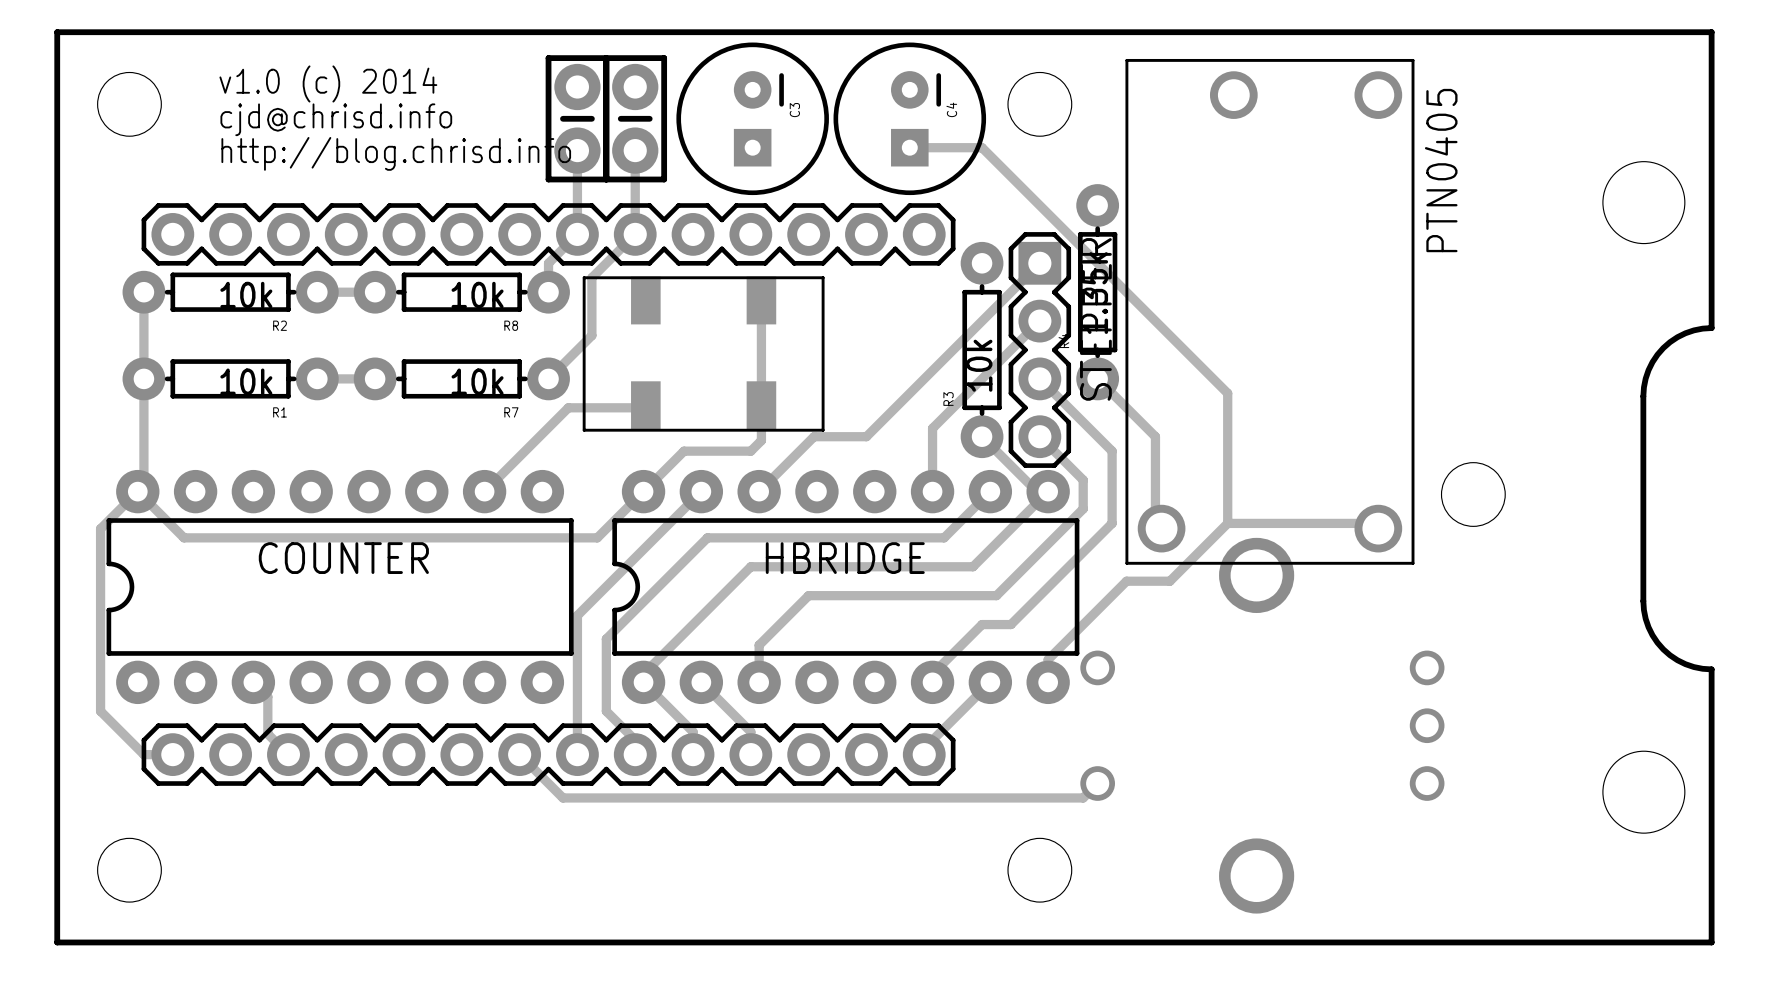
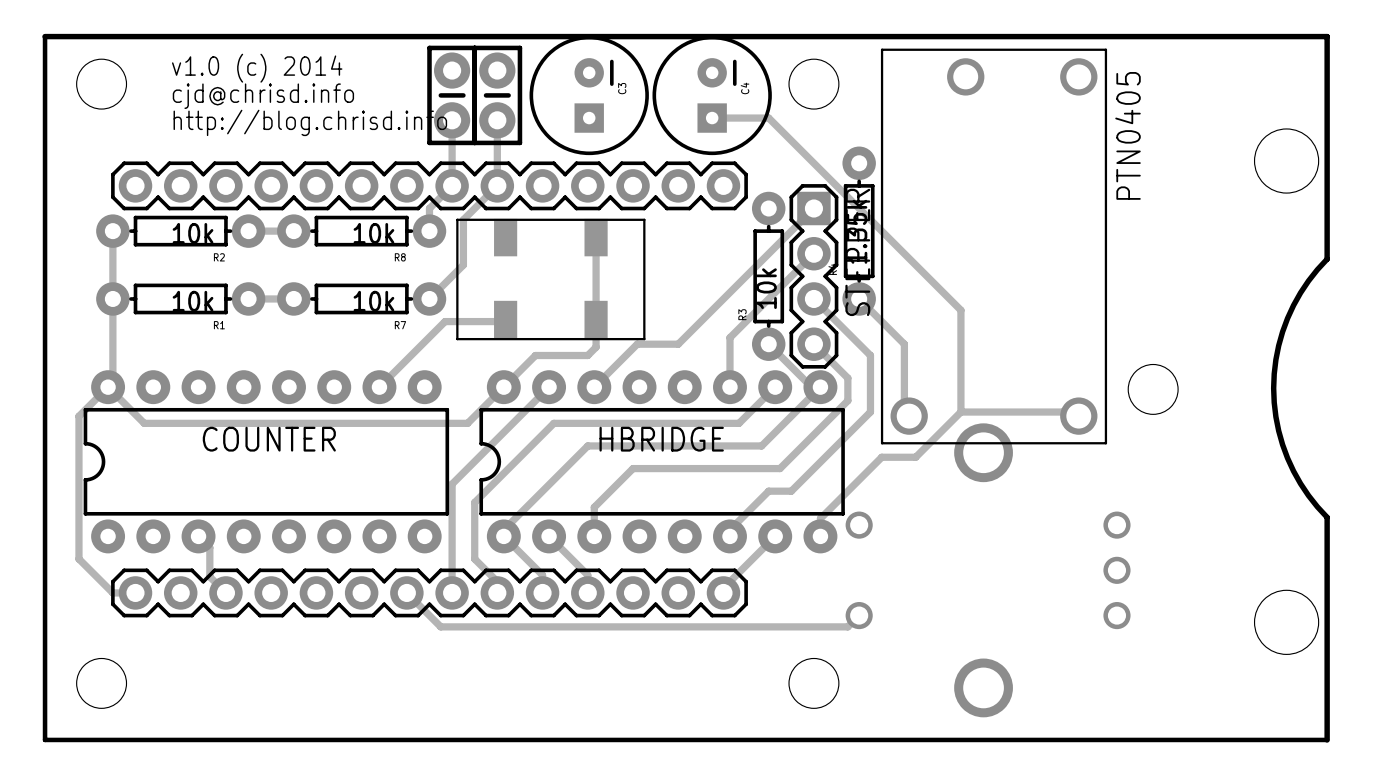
board edge: (57, 43) (57, 32) (1711, 32) (1711, 328) (1685, 333) (1663, 348) (1648, 370) (1643, 396) (1643, 601) (1645, 618) (1657, 642) (1670, 655) (1693, 667) (1711, 669) (1711, 942) (1695, 942) -> (45, 36) (1327, 36) (1327, 259) (1300, 292) (1287, 318) (1278, 345) (1273, 388) (1278, 430) (1287, 458) (1300, 483) (1327, 517) (1327, 739)

